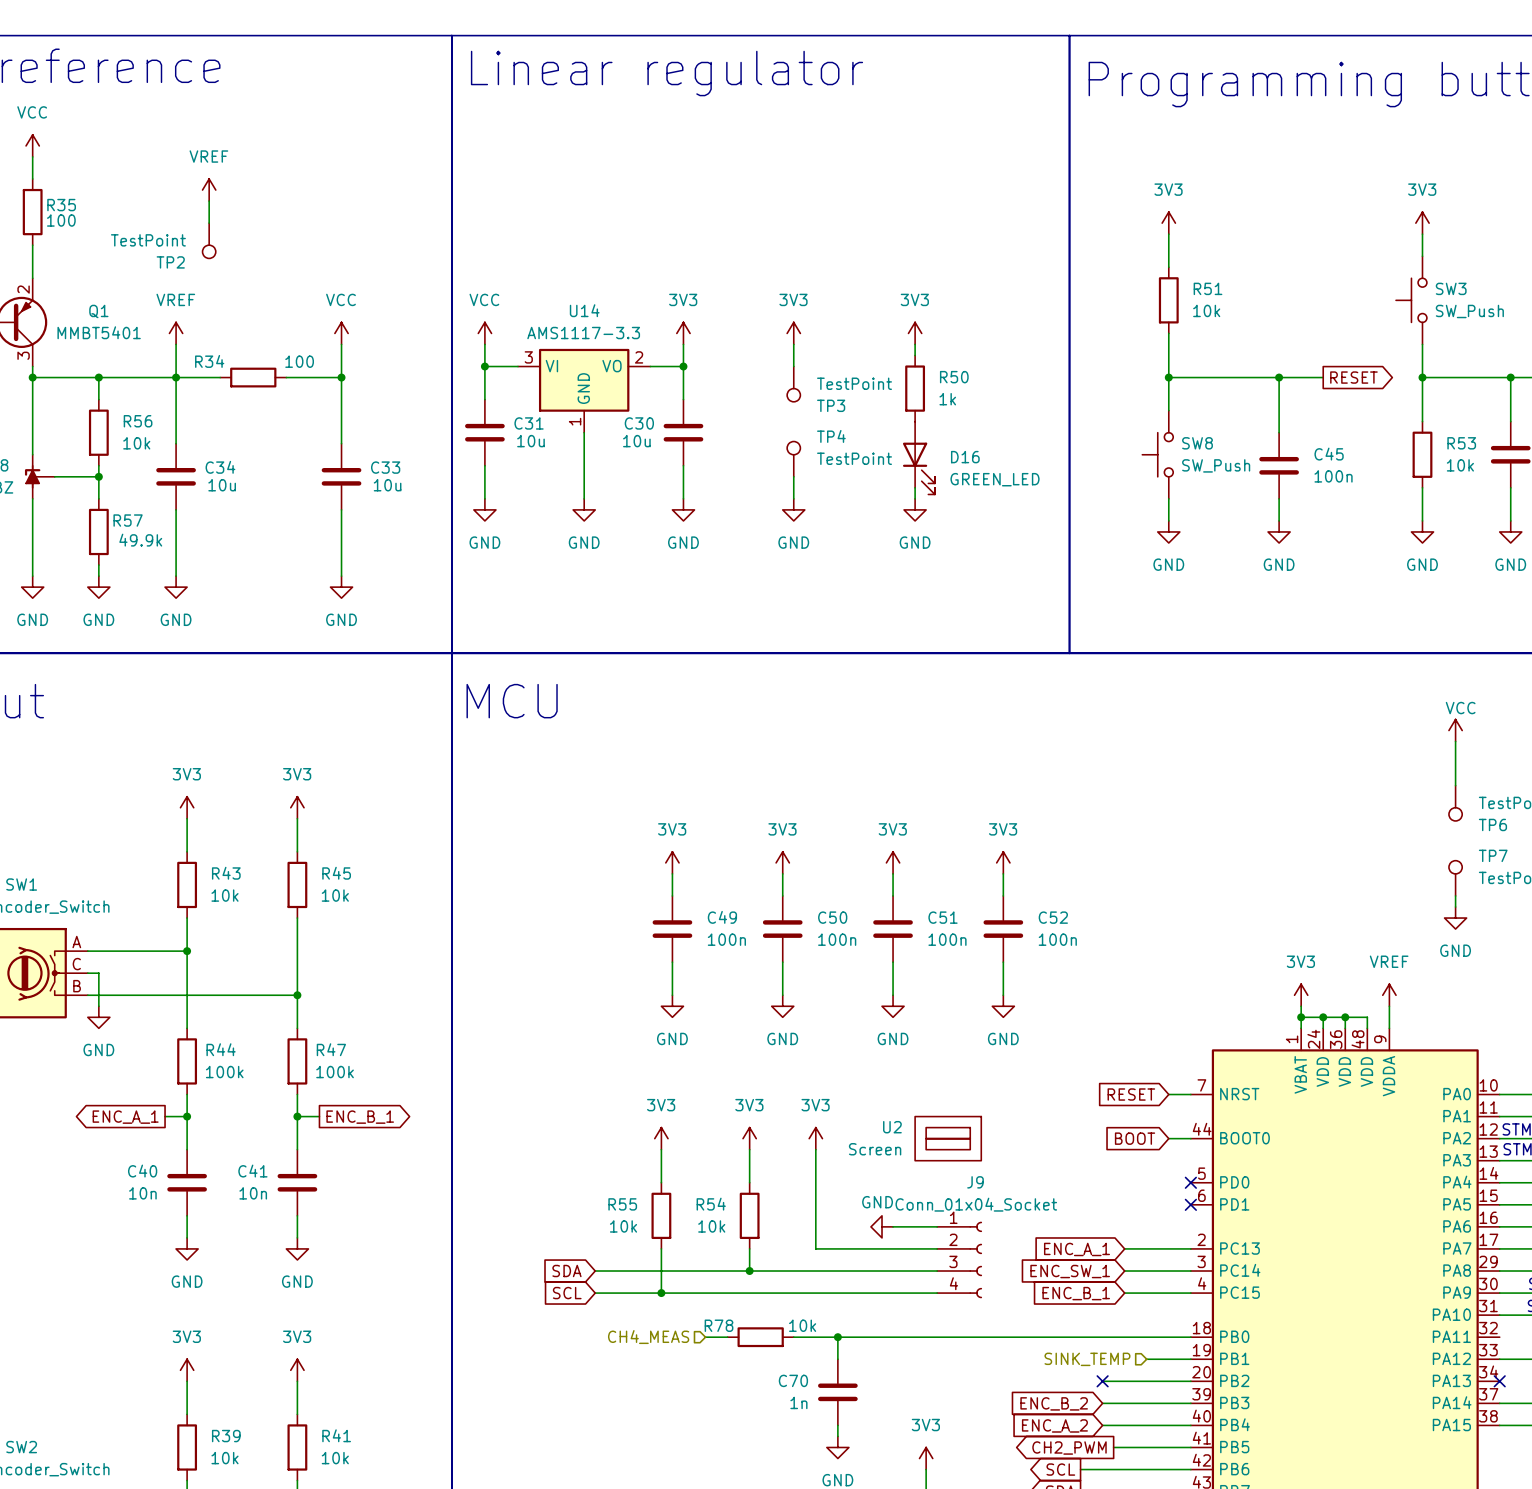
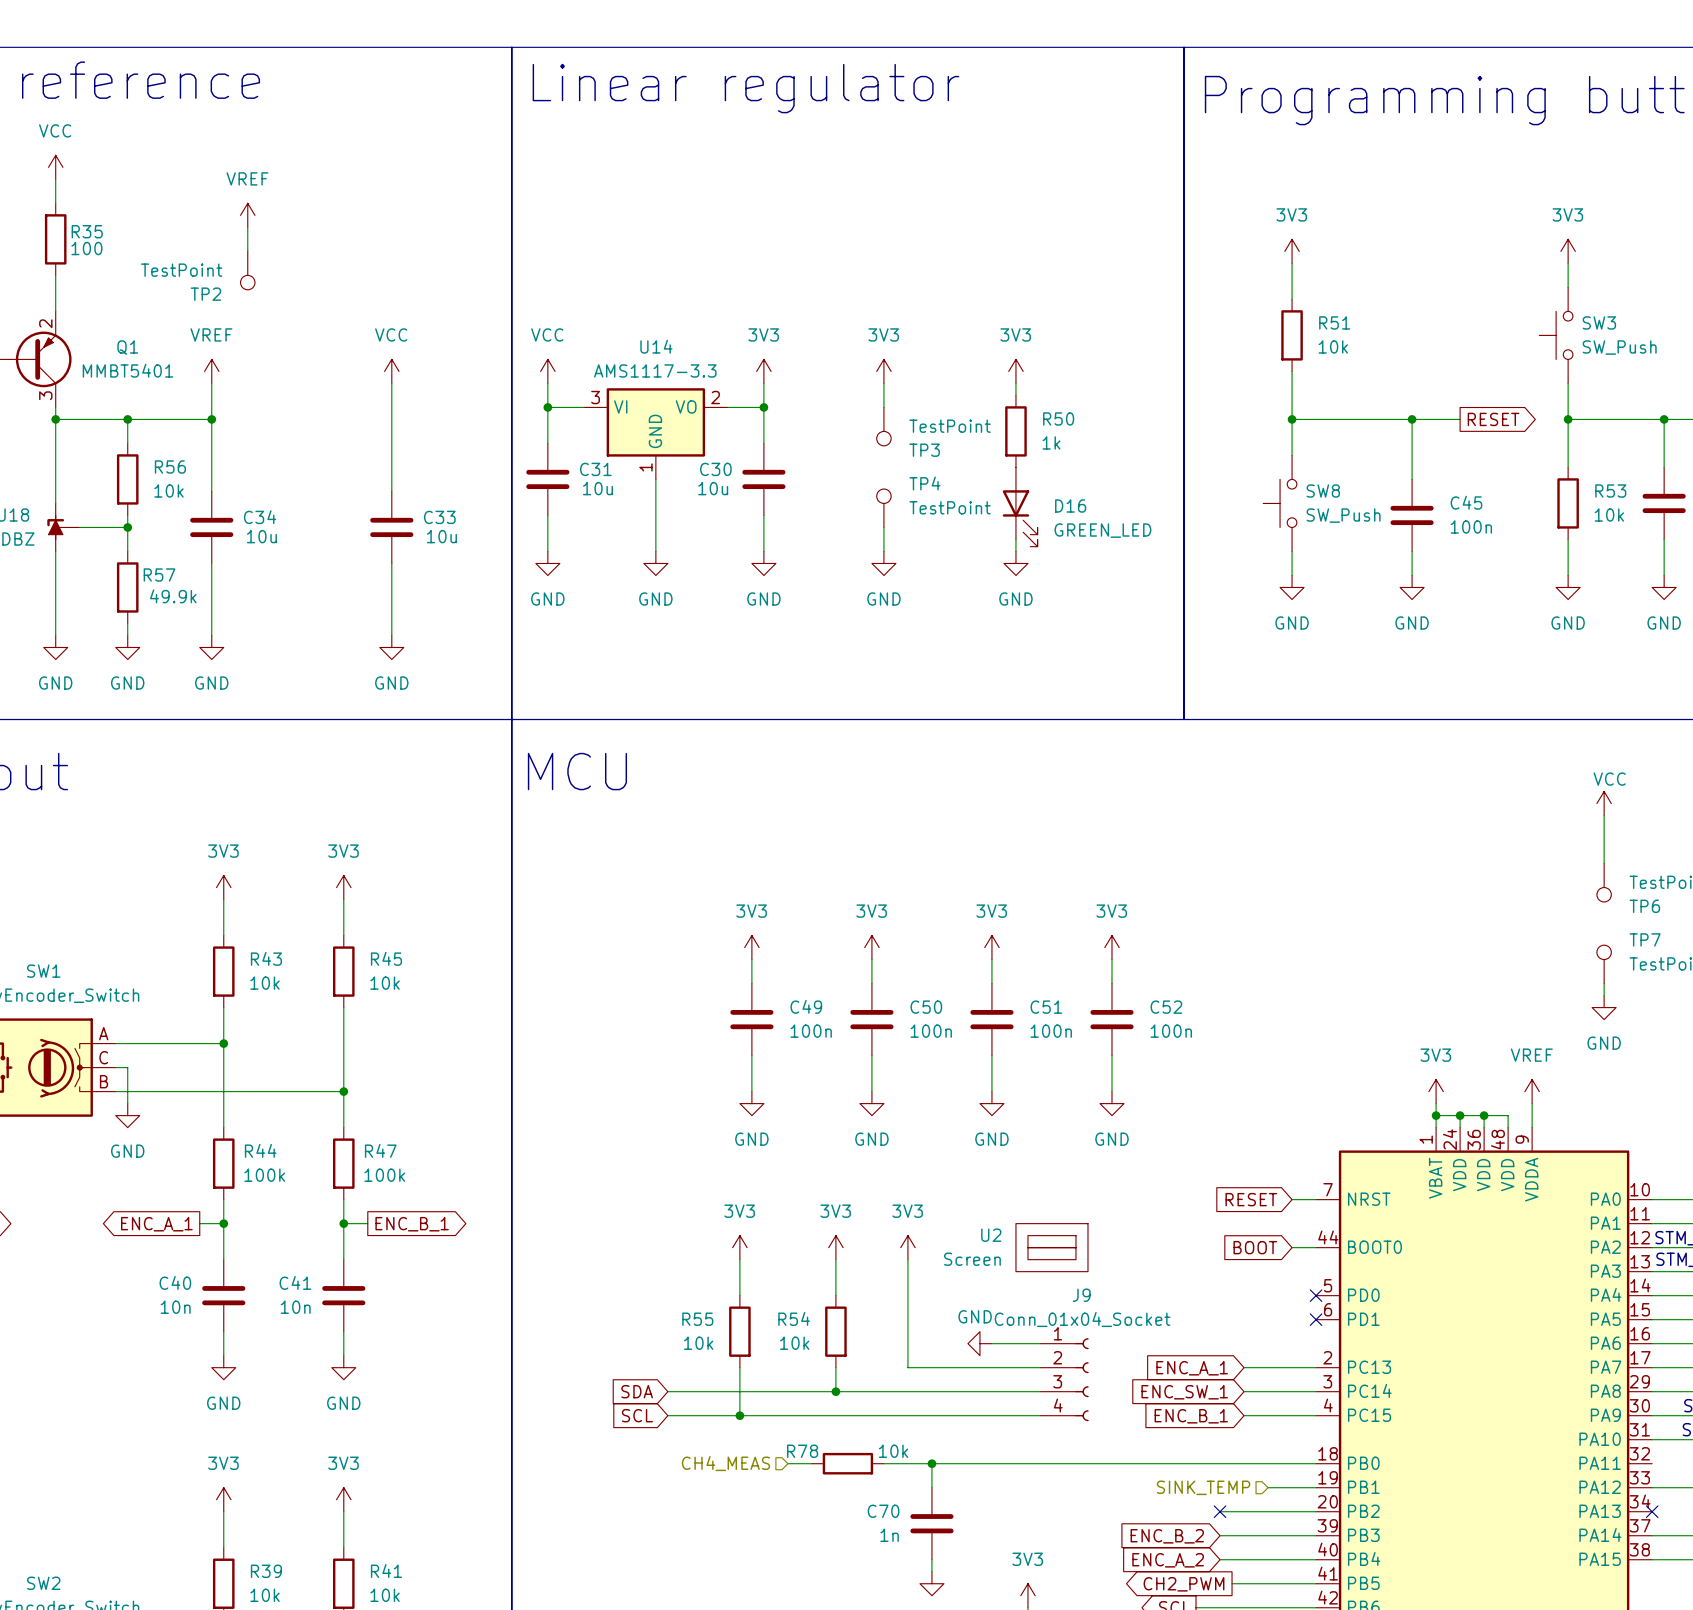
wire: (176, 377) (220, 377) -> none
R34: 100 (253, 377) -> none
wire: (286, 377) (341, 377) -> none
junction: (341, 377) -> none

